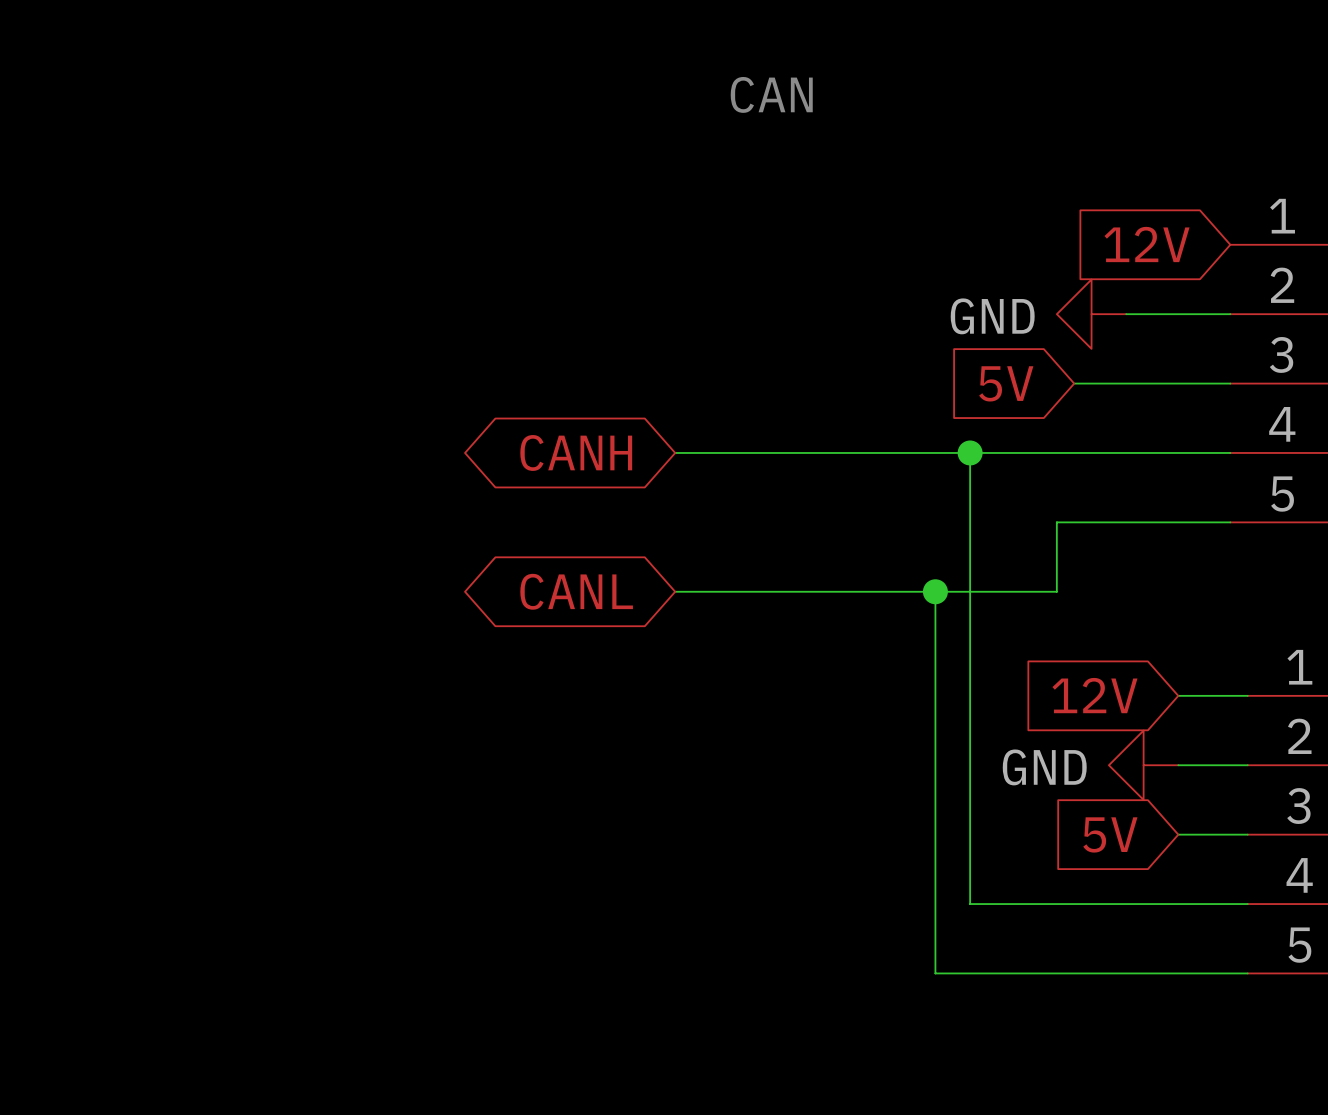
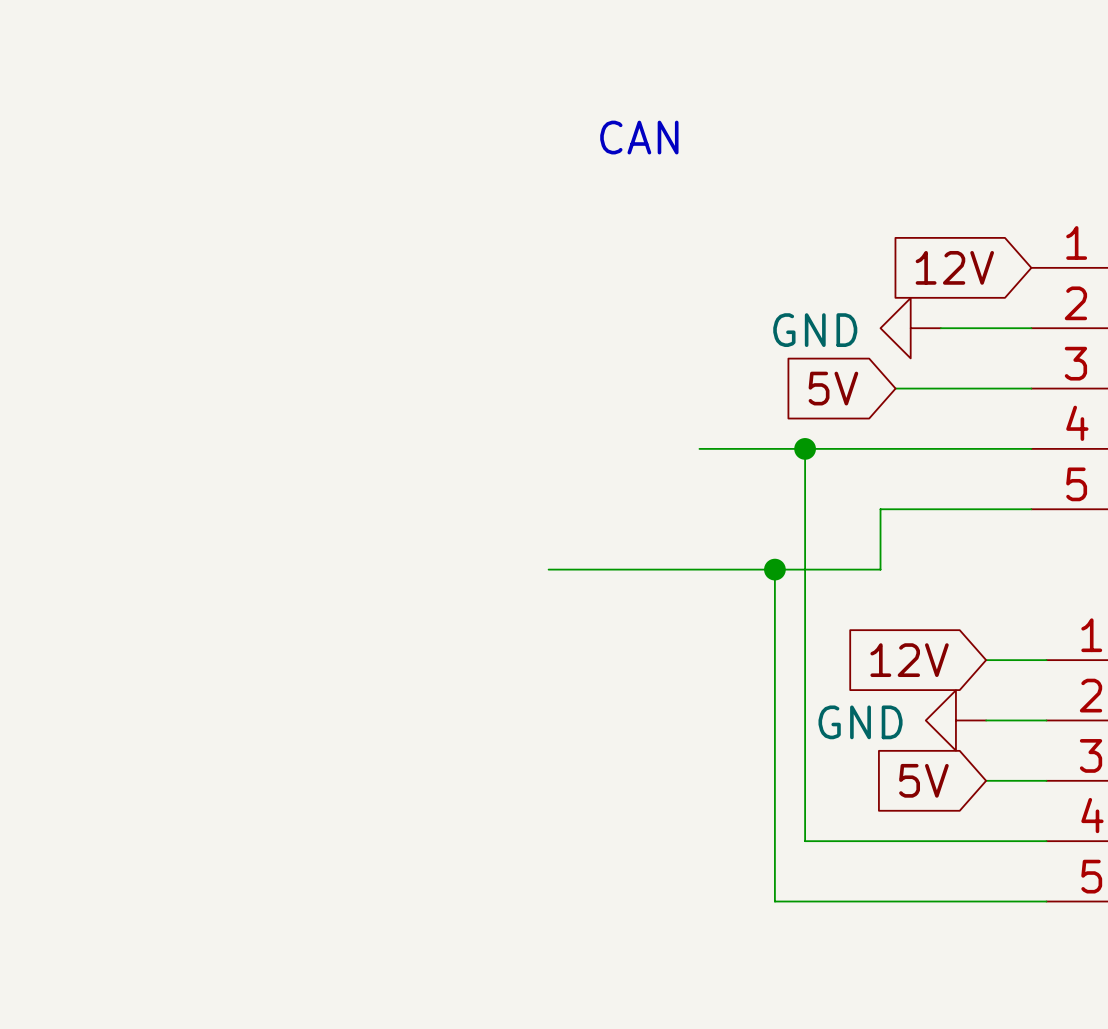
global label: CANH (576, 452) -> none
wire: (675, 452) (848, 452) -> none
global label: CANL (576, 591) -> none

